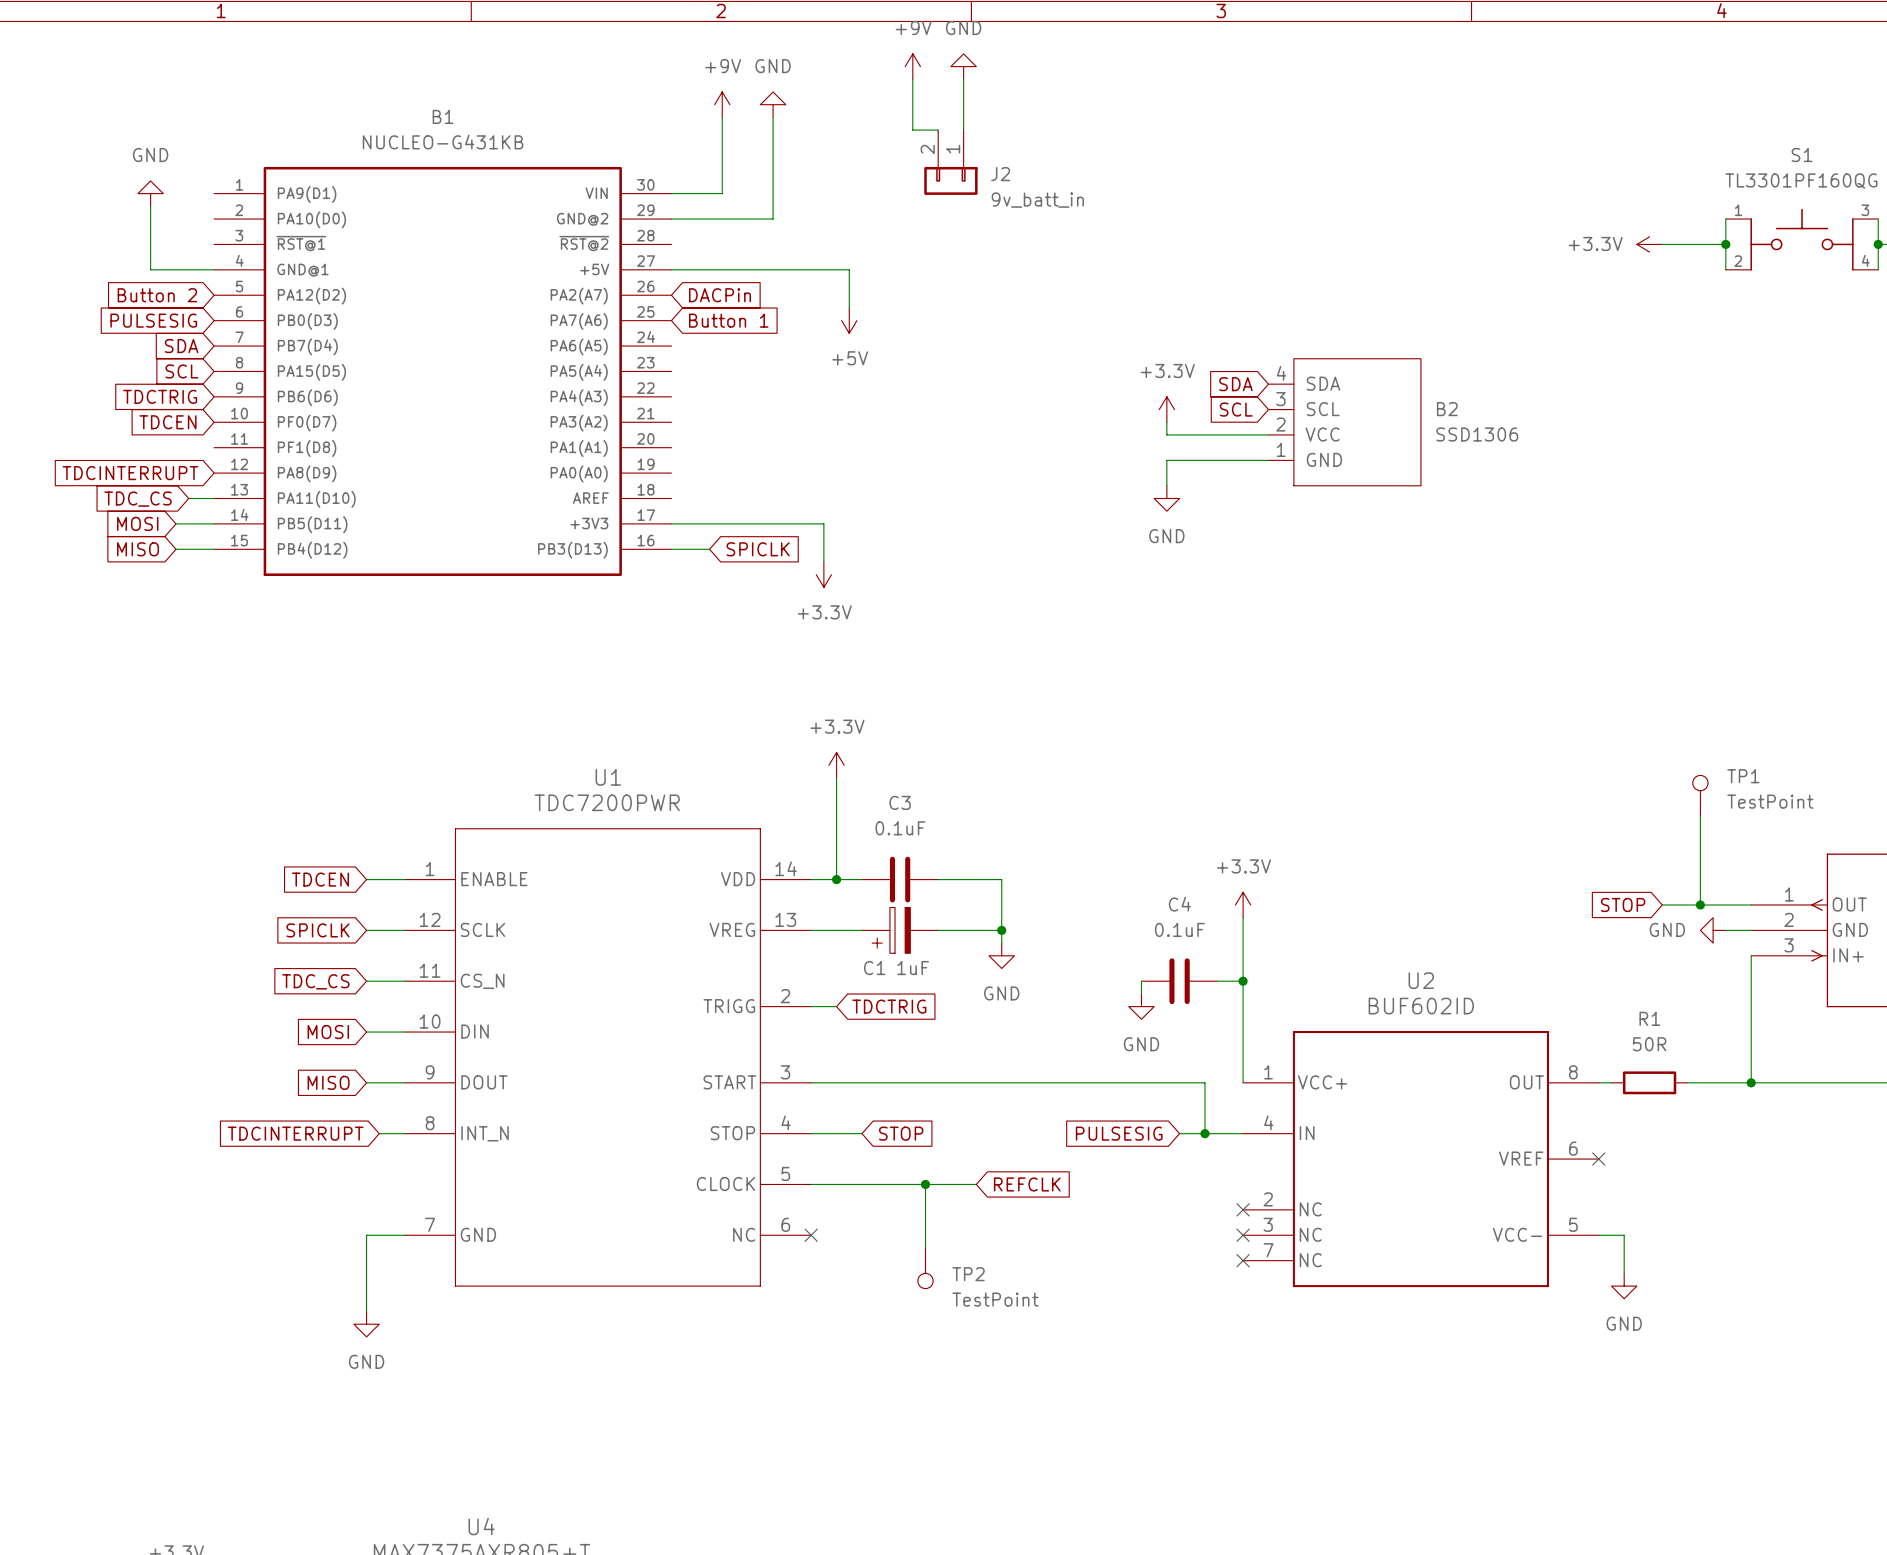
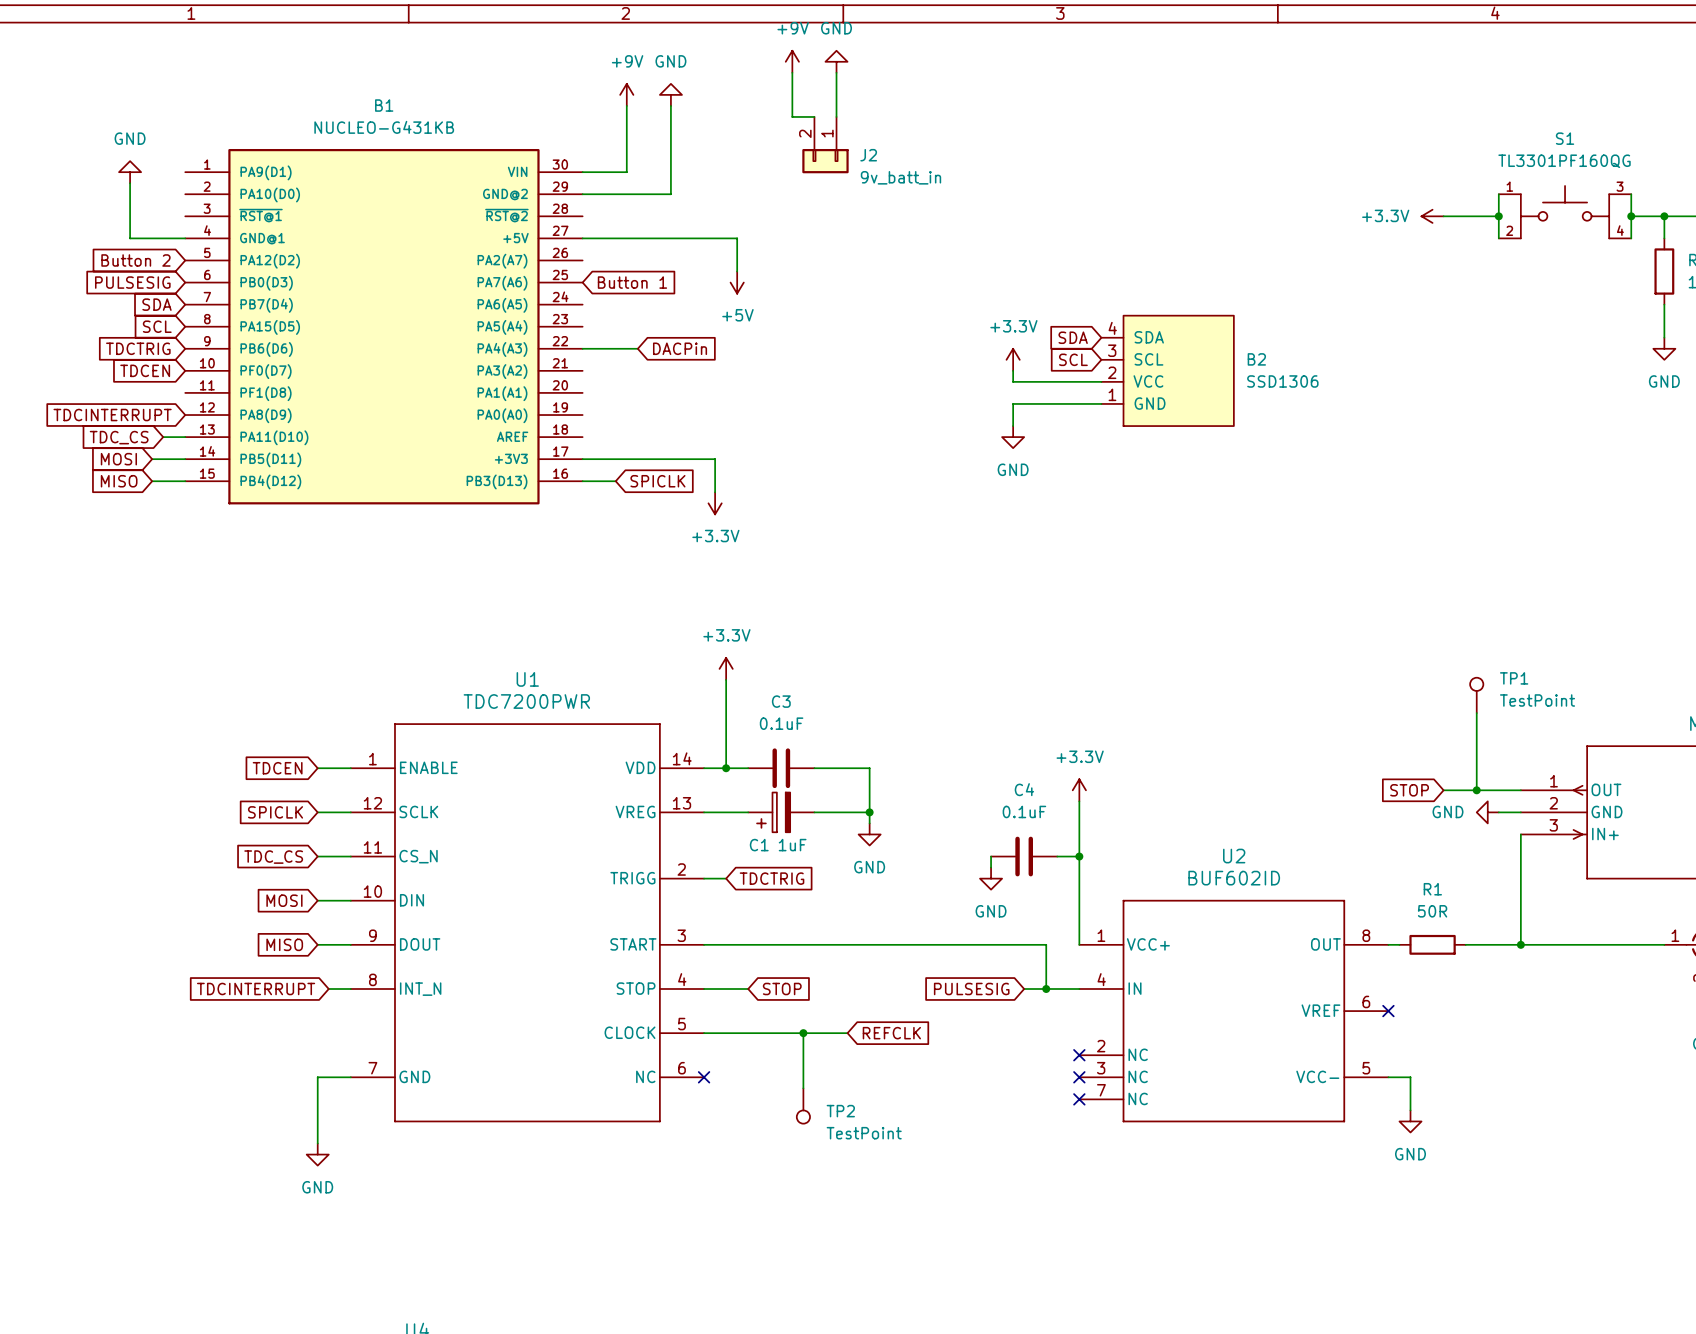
global label position: DACPin (720, 295) -> DACPin (680, 348)
wire: none -> (582, 348) (637, 348)

